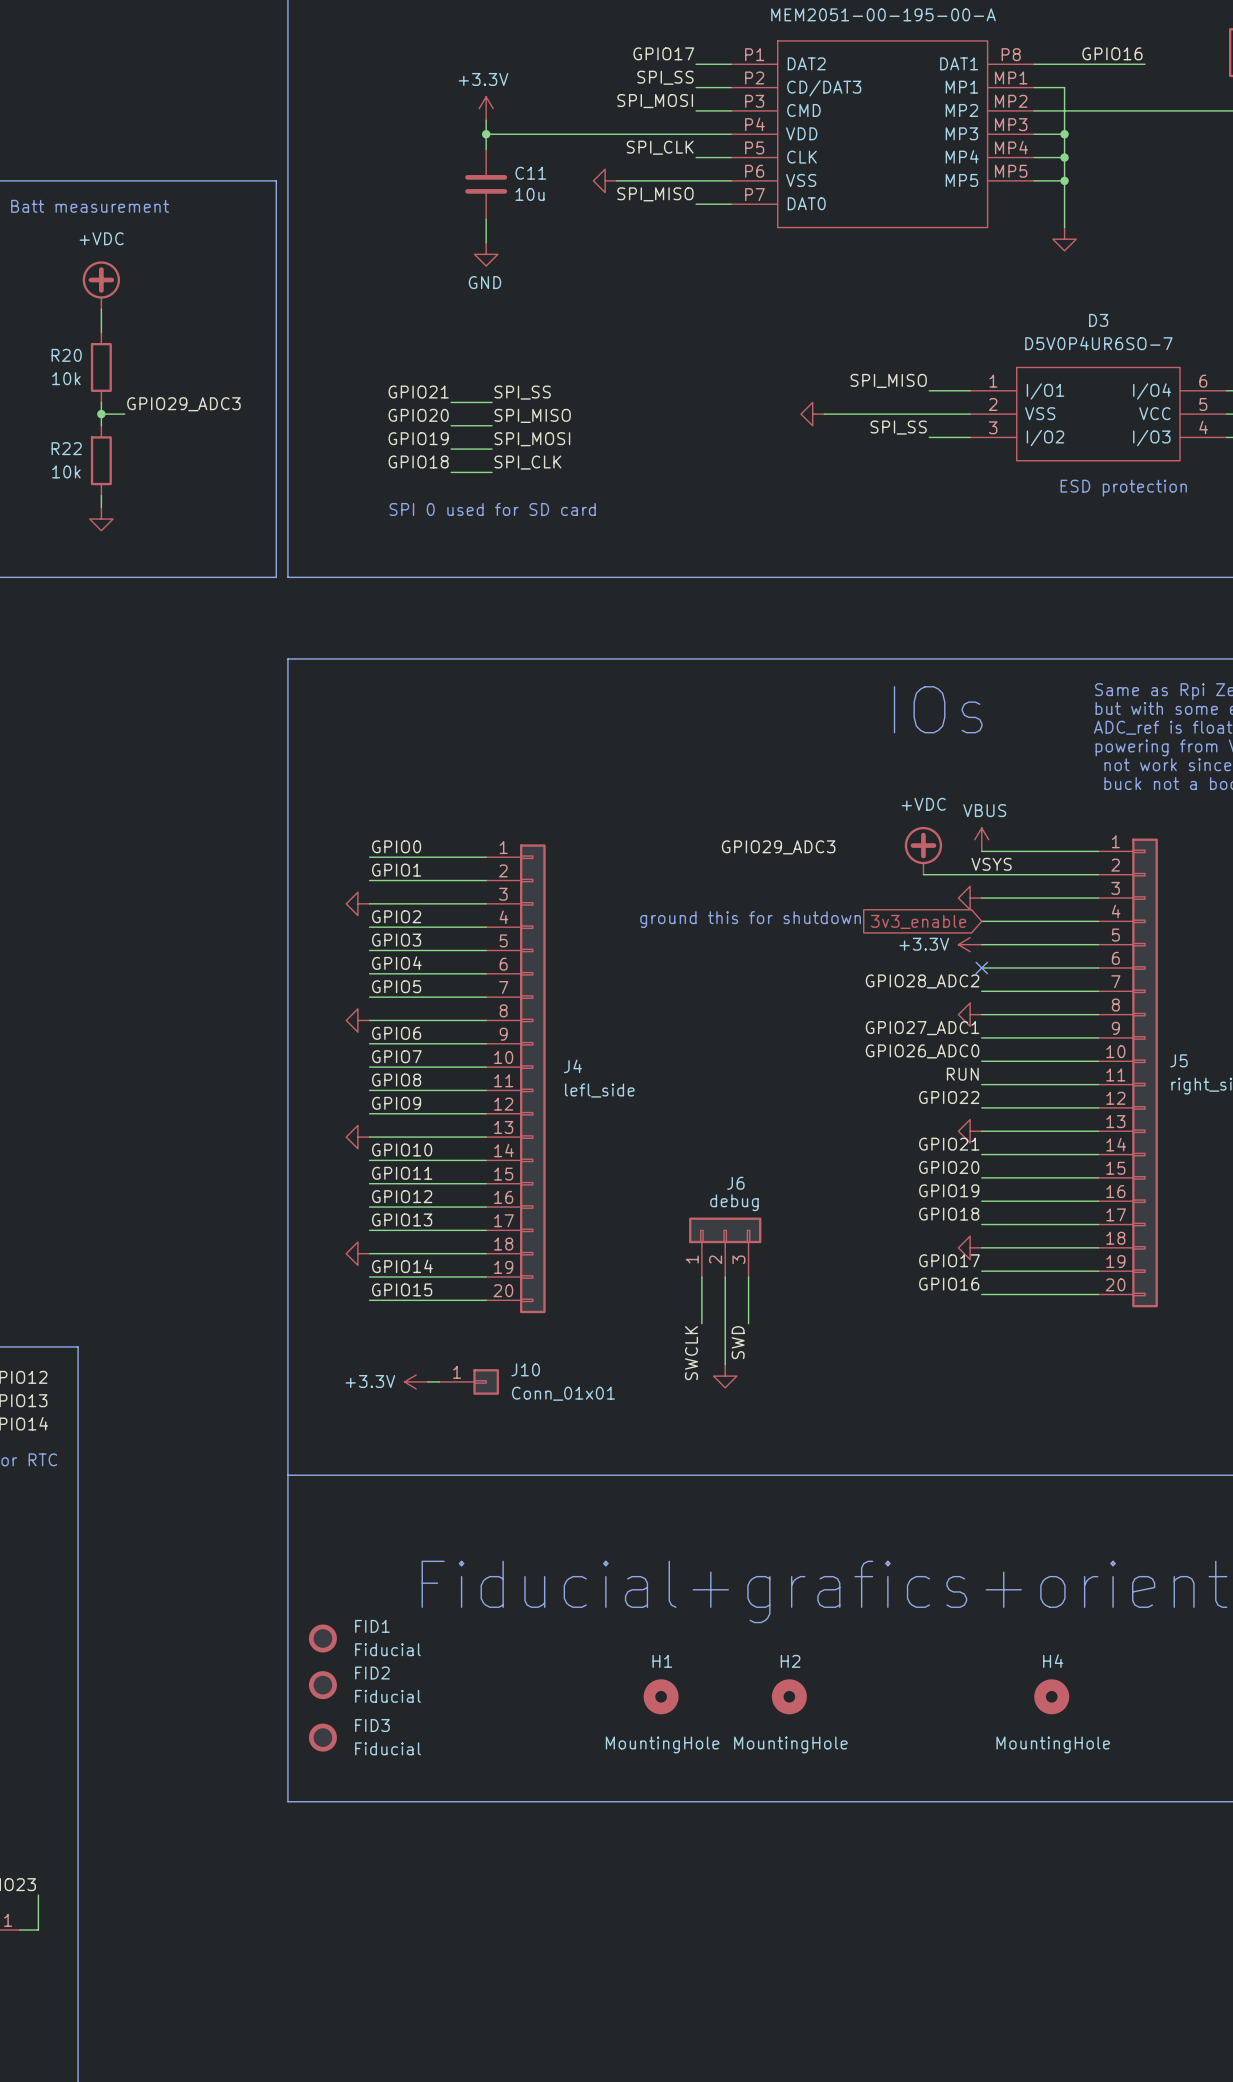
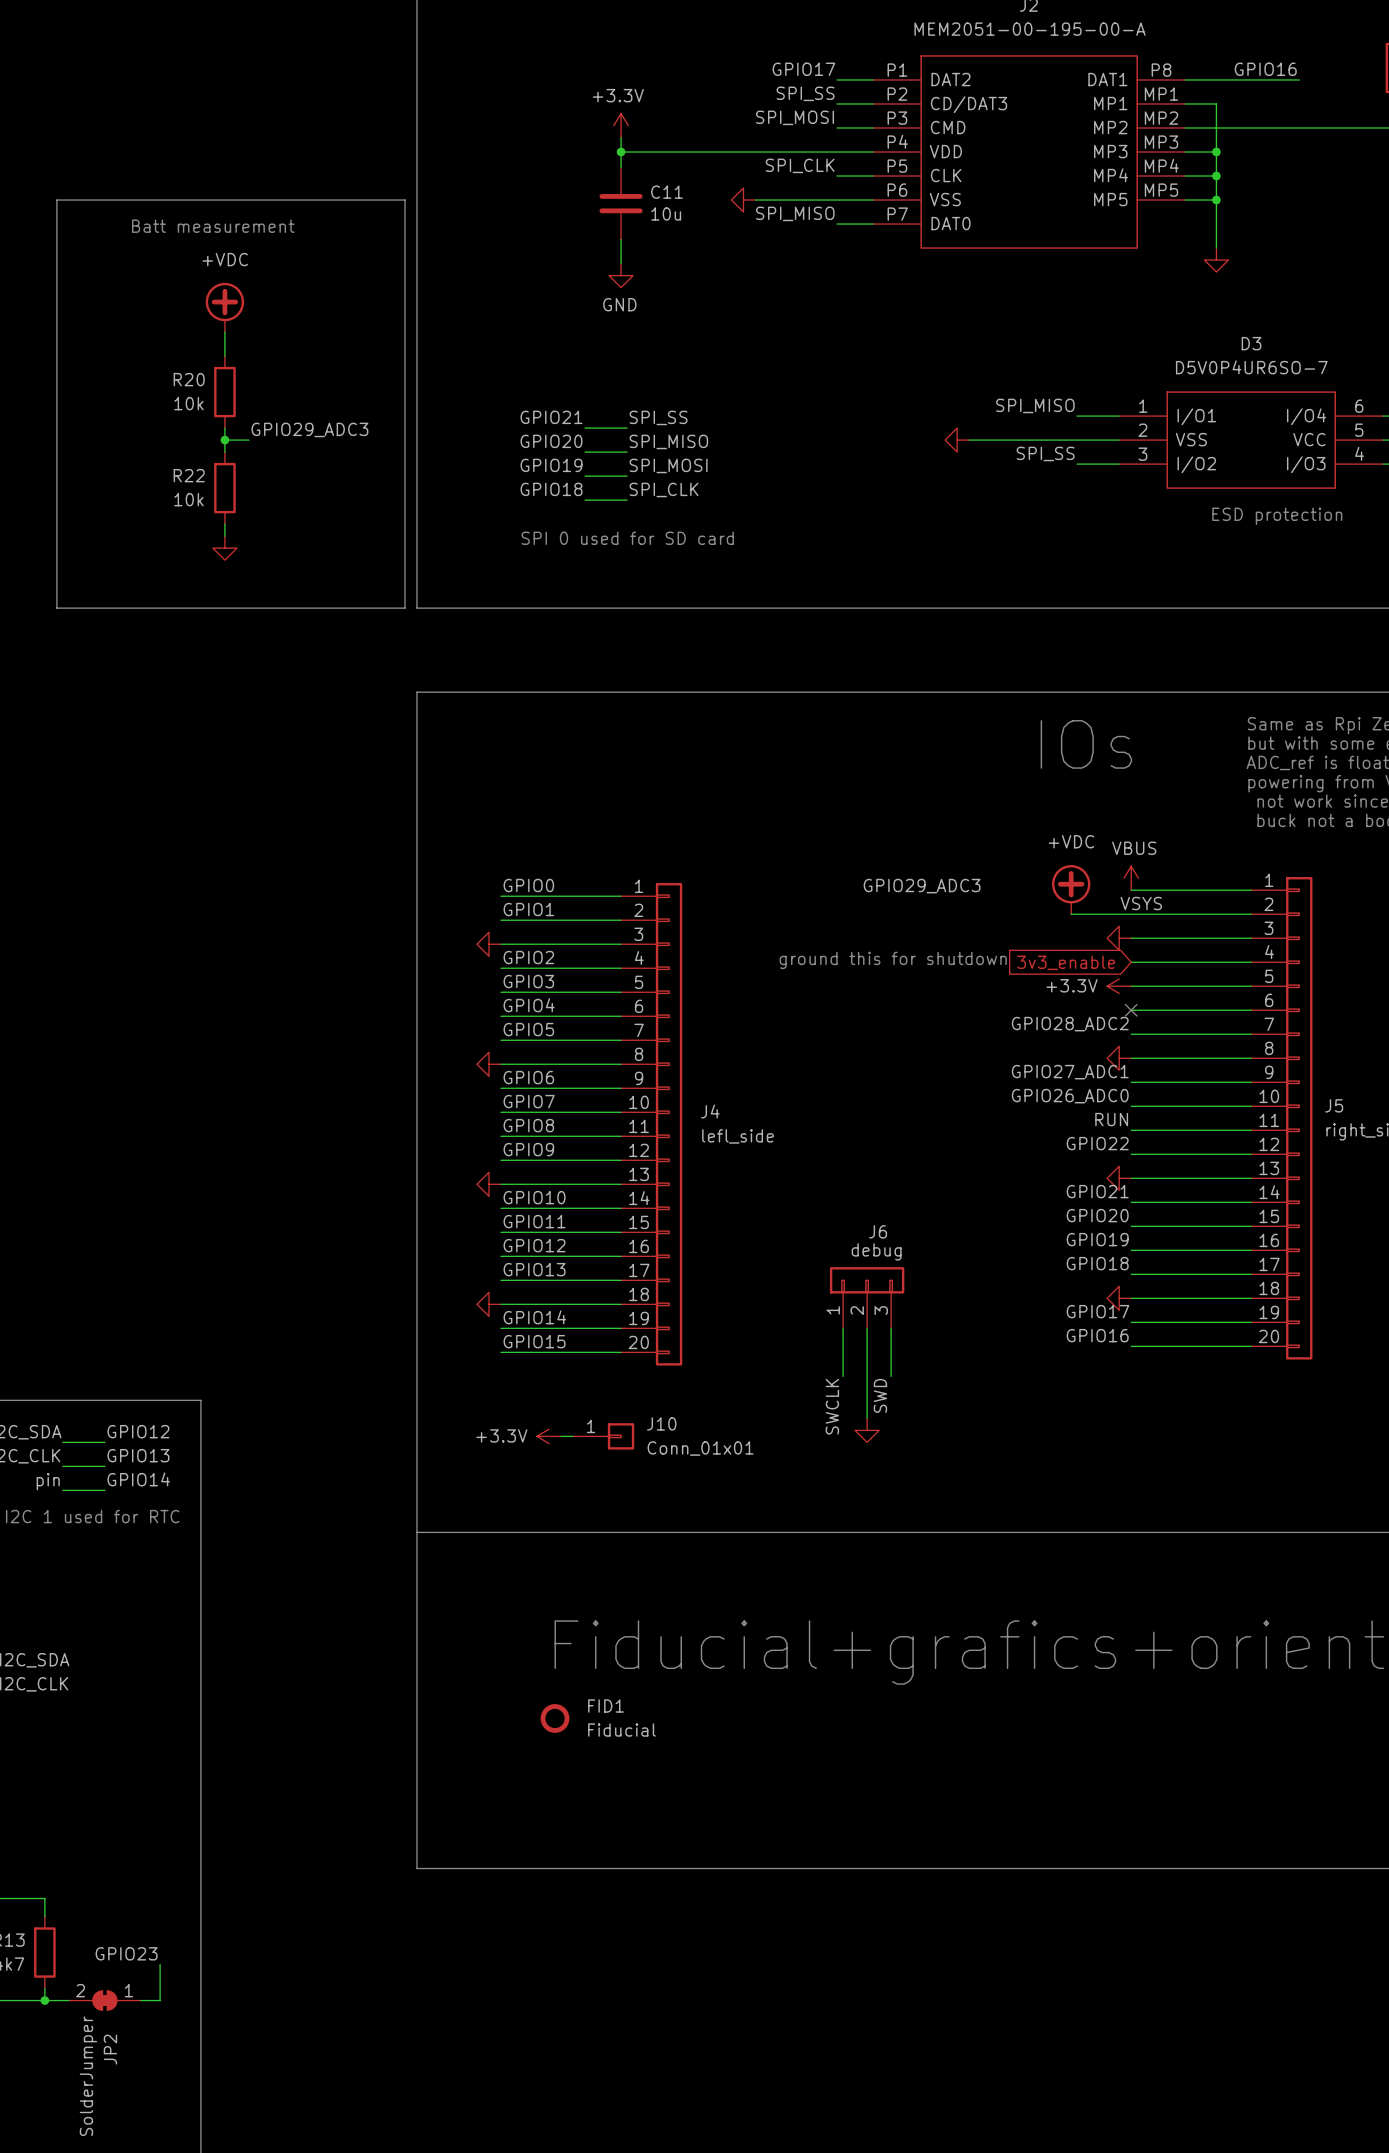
FID1 position: (322, 1638) -> (555, 1718)
FID2: Fiducial (322, 1685) -> none
H1: MountingHole (661, 1696) -> none
H2: MountingHole (789, 1696) -> none
H4: MountingHole (1051, 1696) -> none
FID3: Fiducial (322, 1737) -> none

